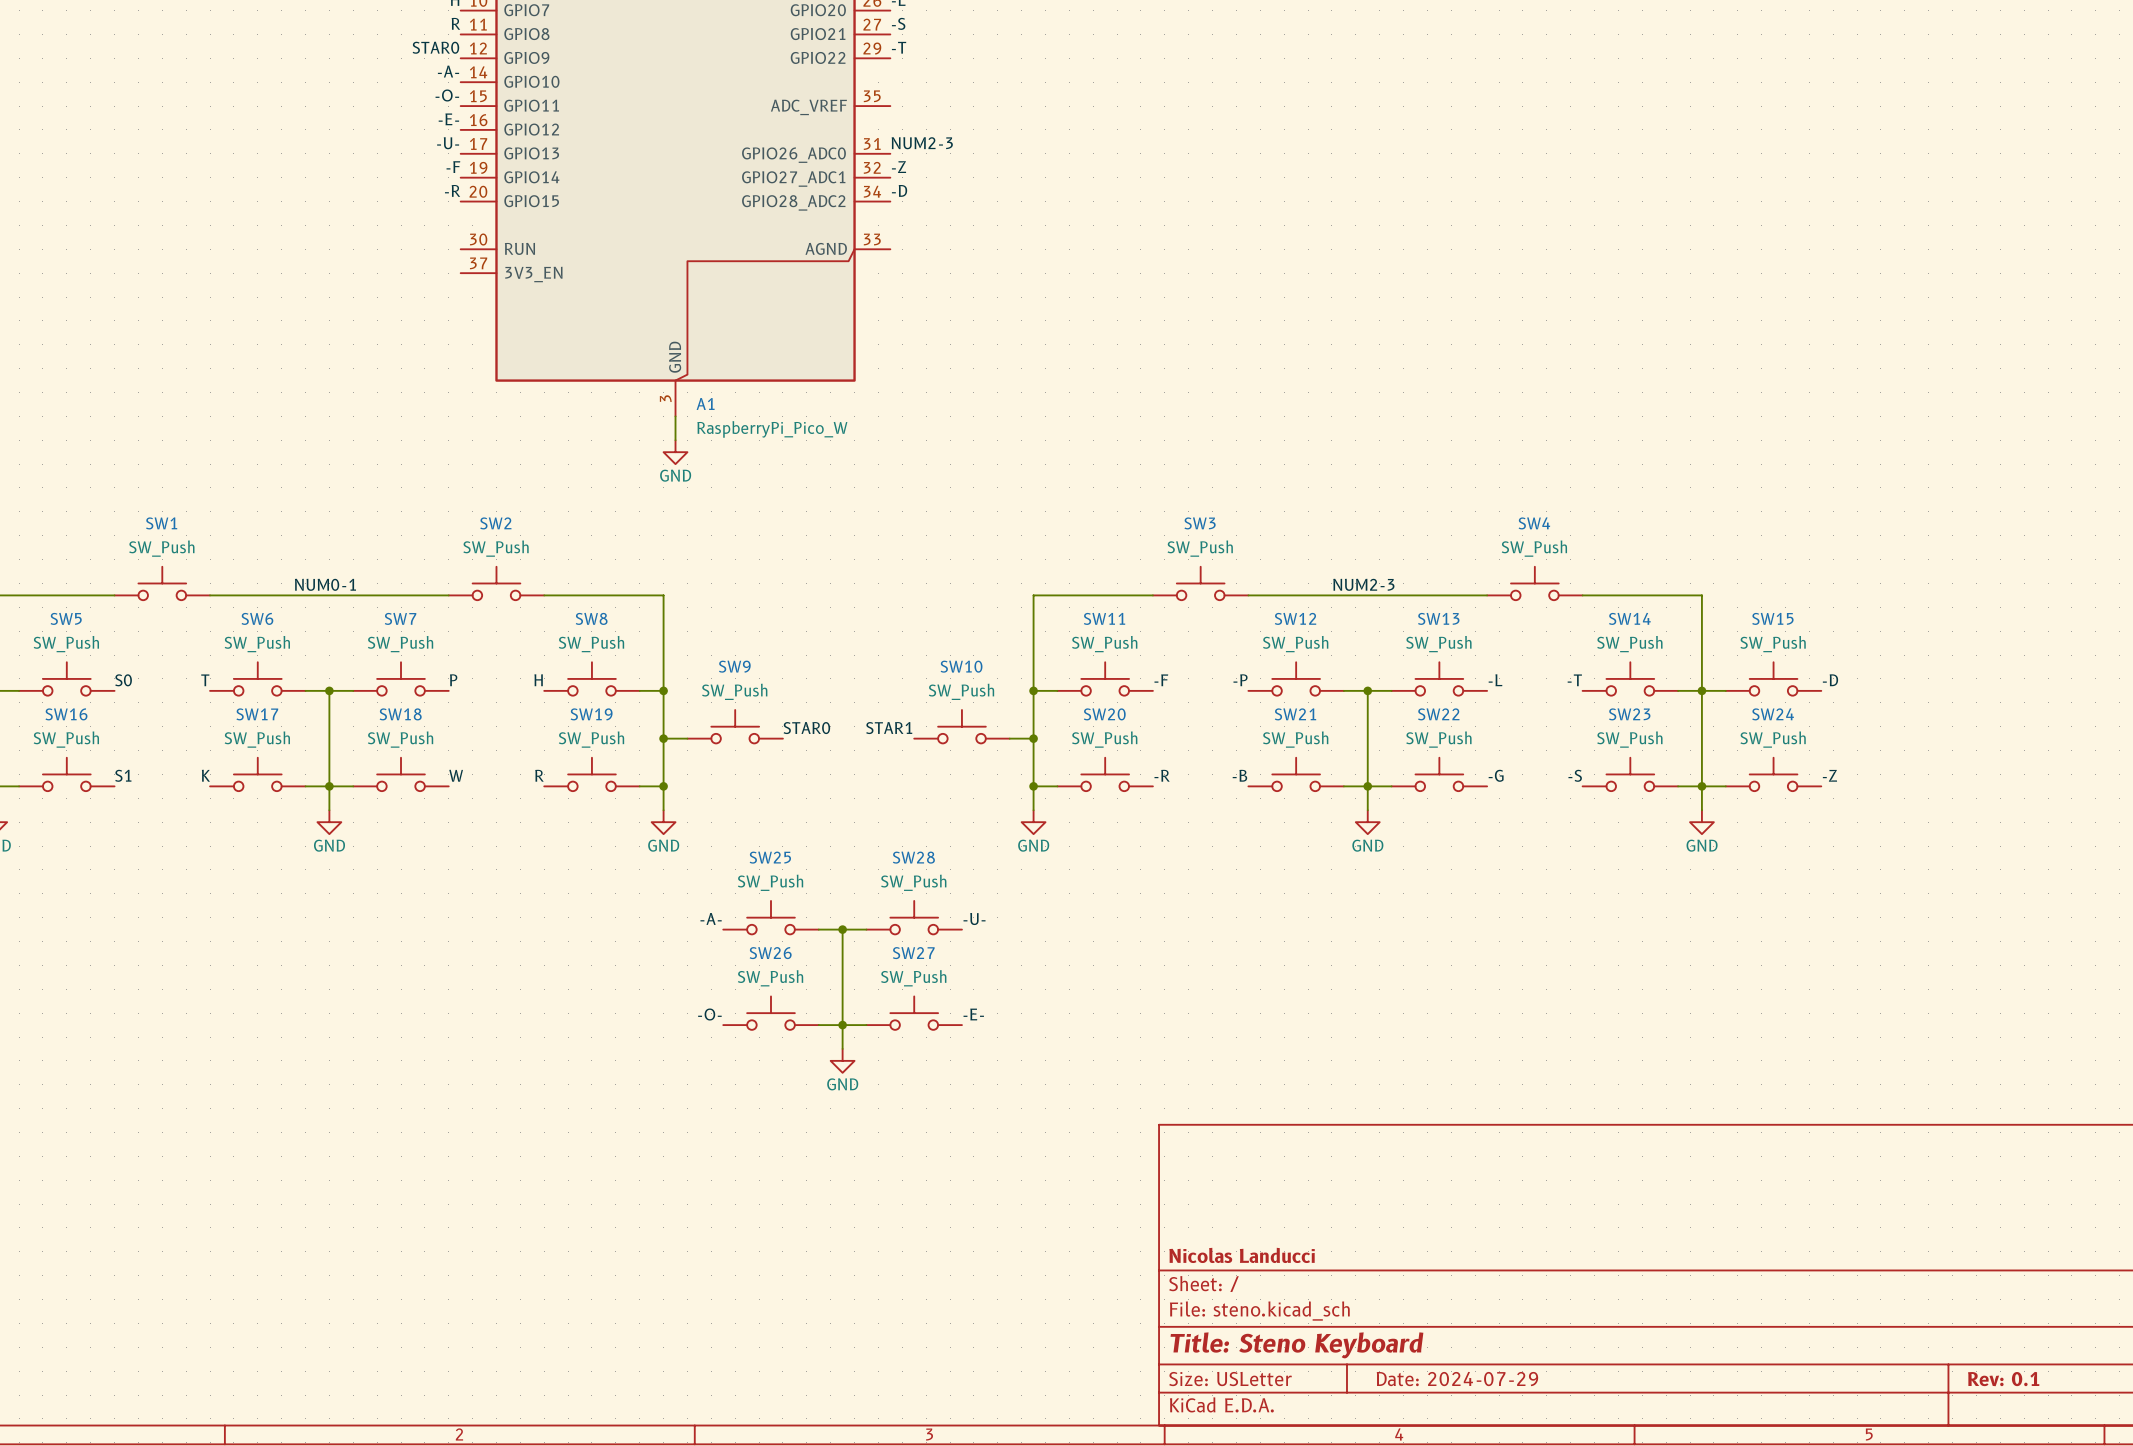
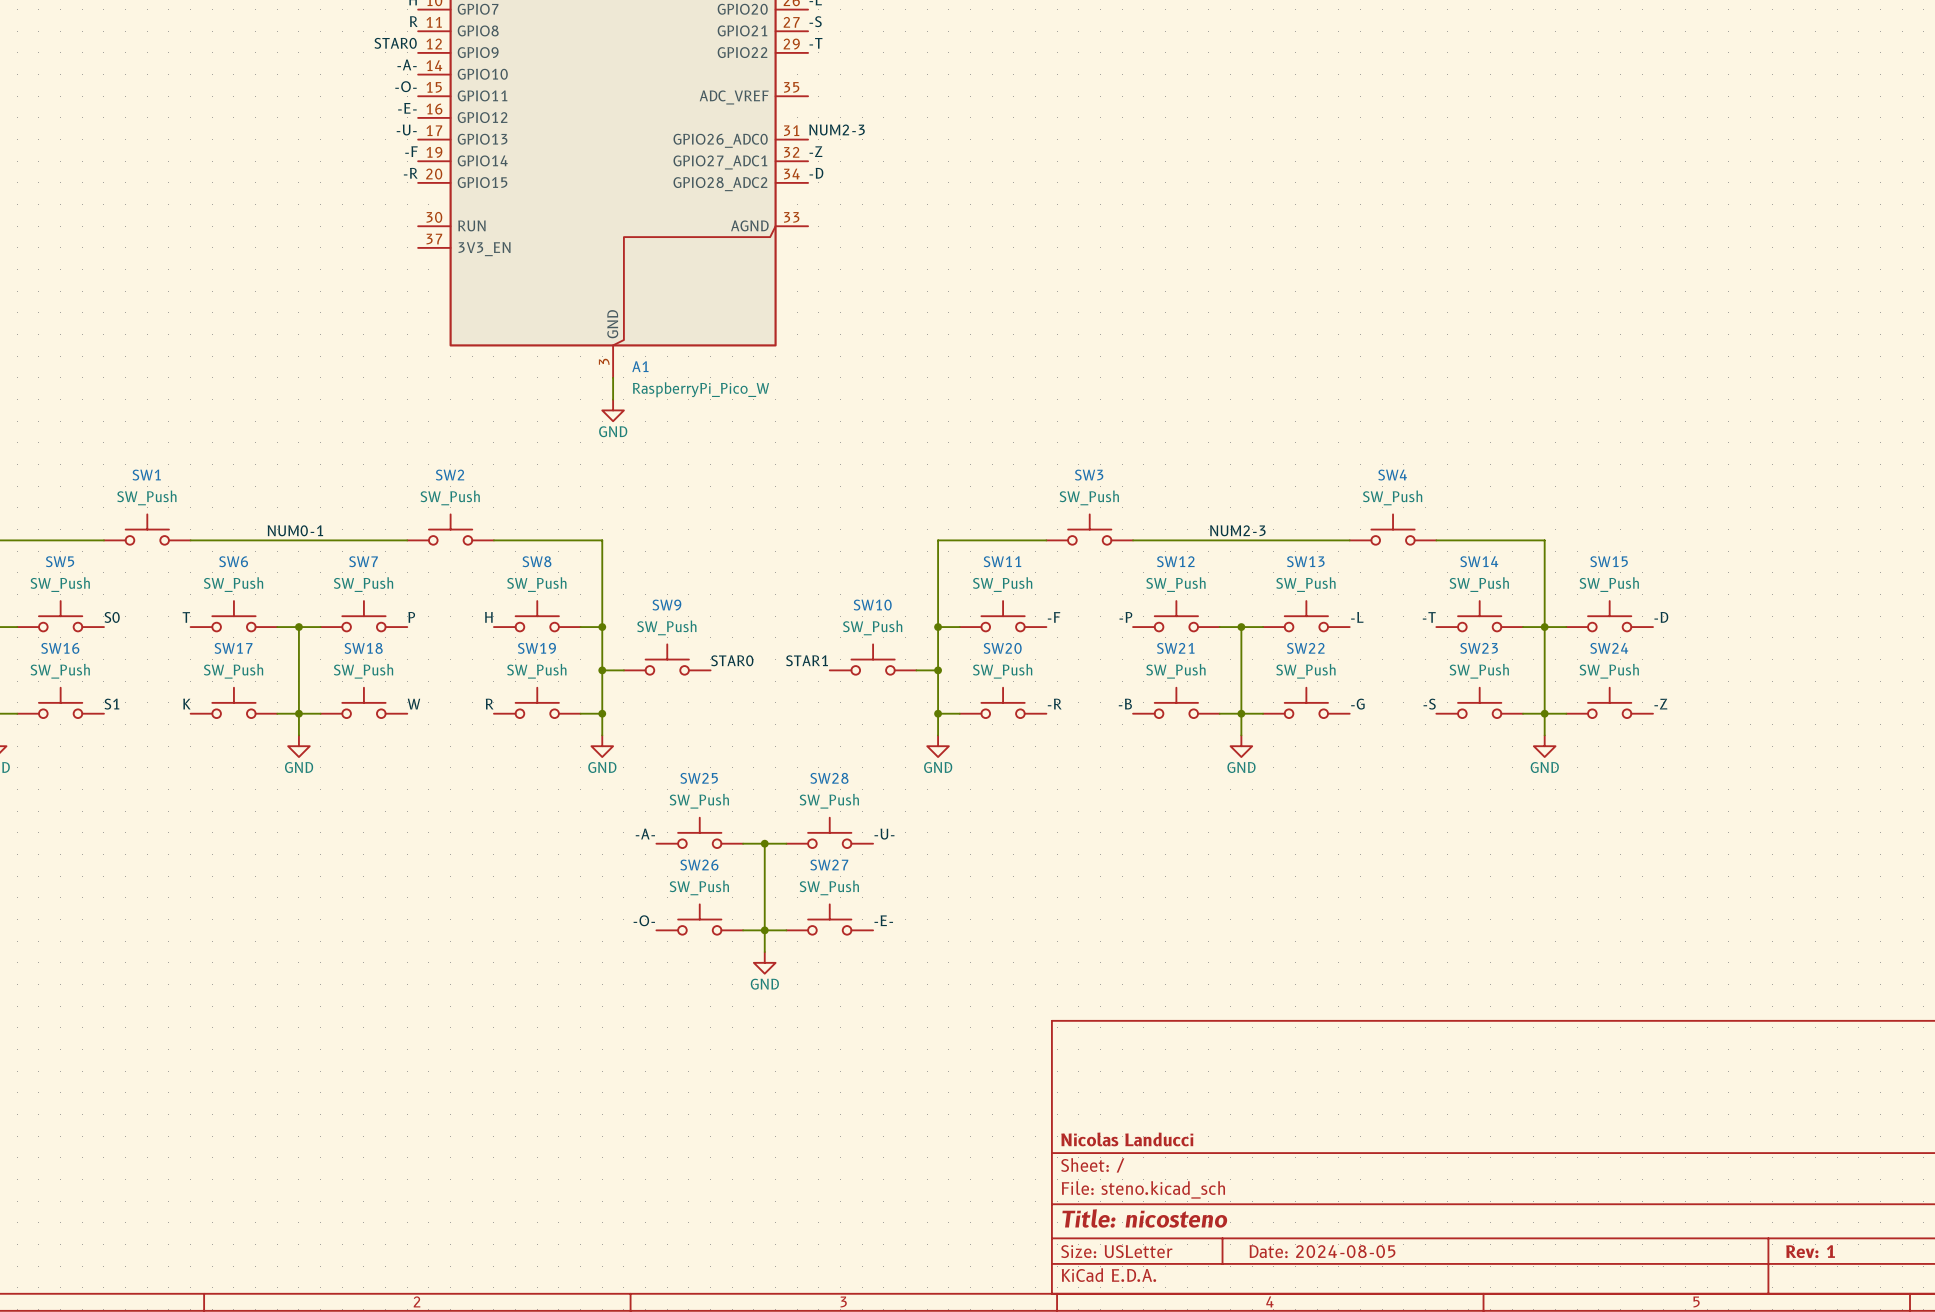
title block: Title: Steno Keyboard (1296, 1345) -> Title: nicosteno (1144, 1218)
title block: Date: 2024-07-29 (1457, 1379) -> Date: 2024-08-05 (1322, 1251)
title block: Rev: 0.1 (2003, 1379) -> Rev: 1 (1810, 1251)

